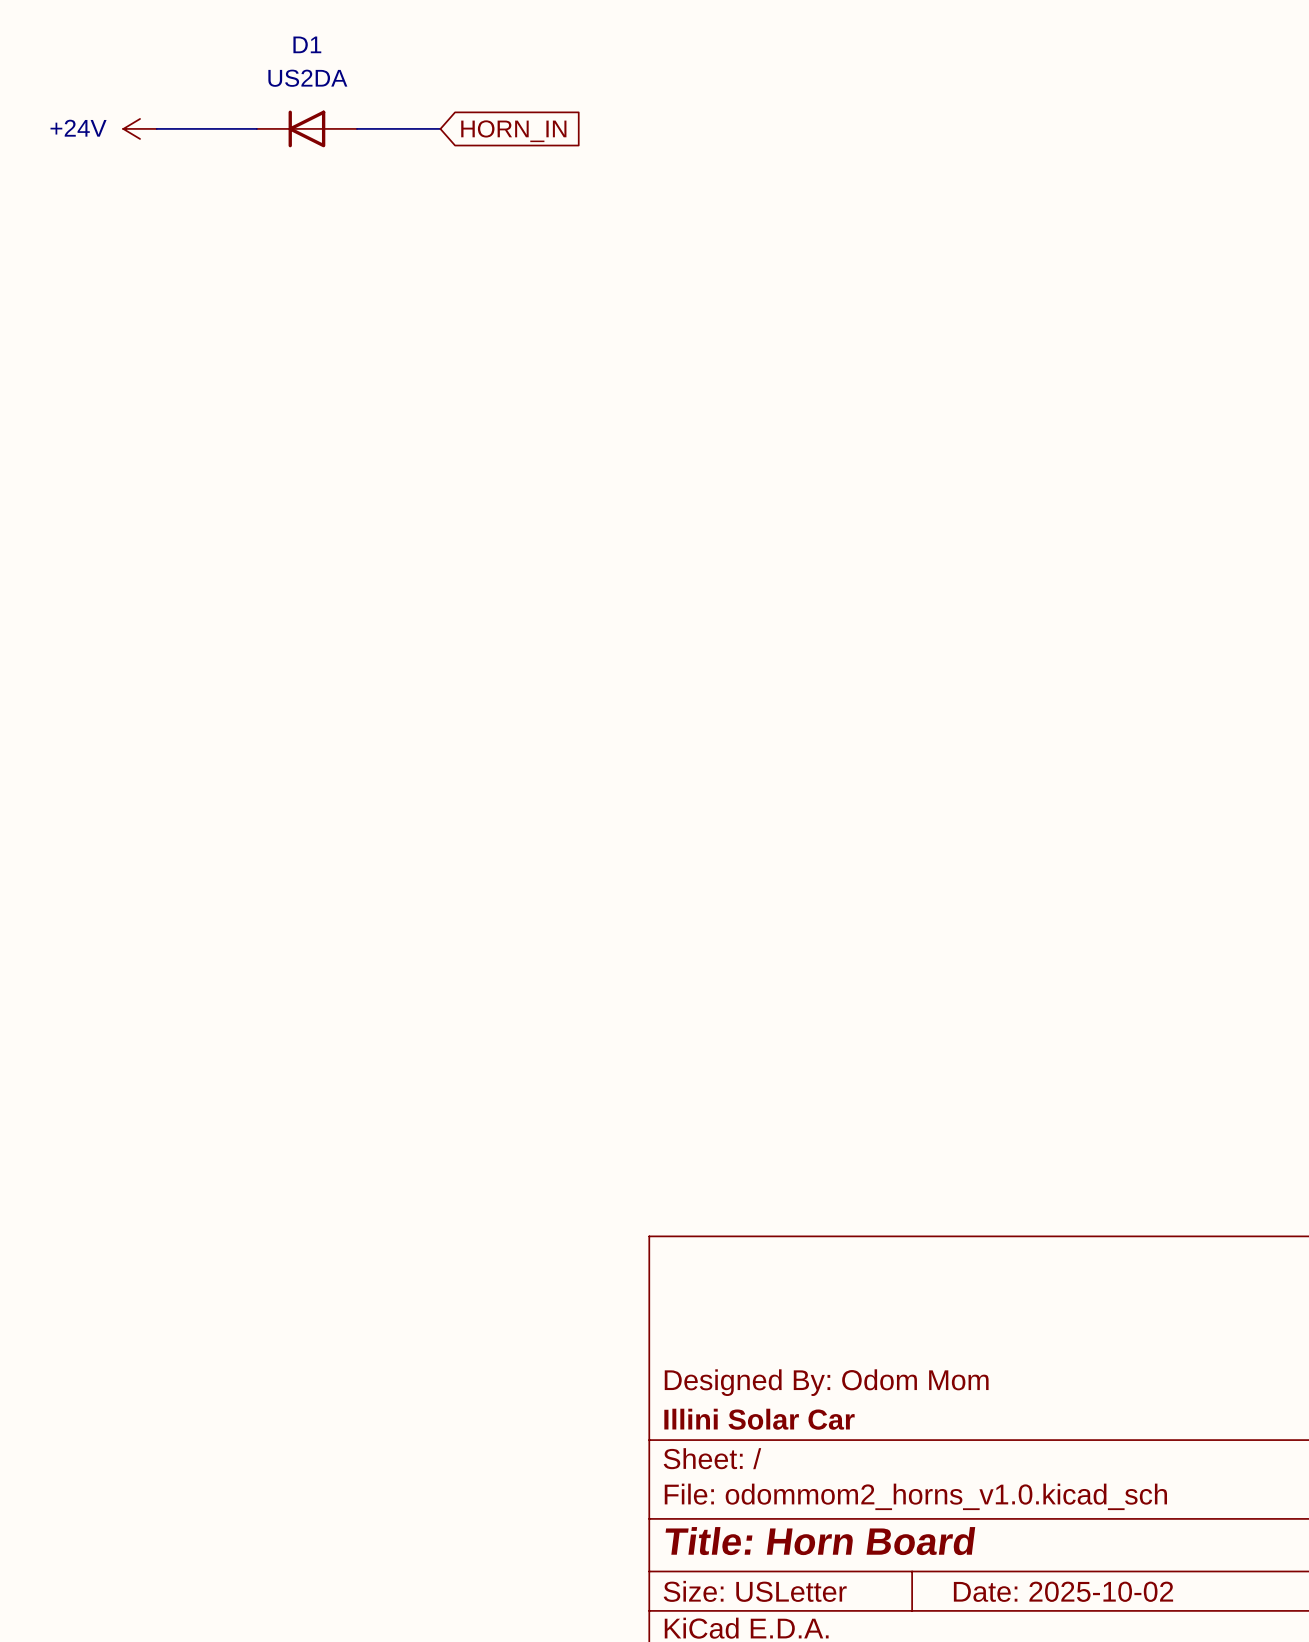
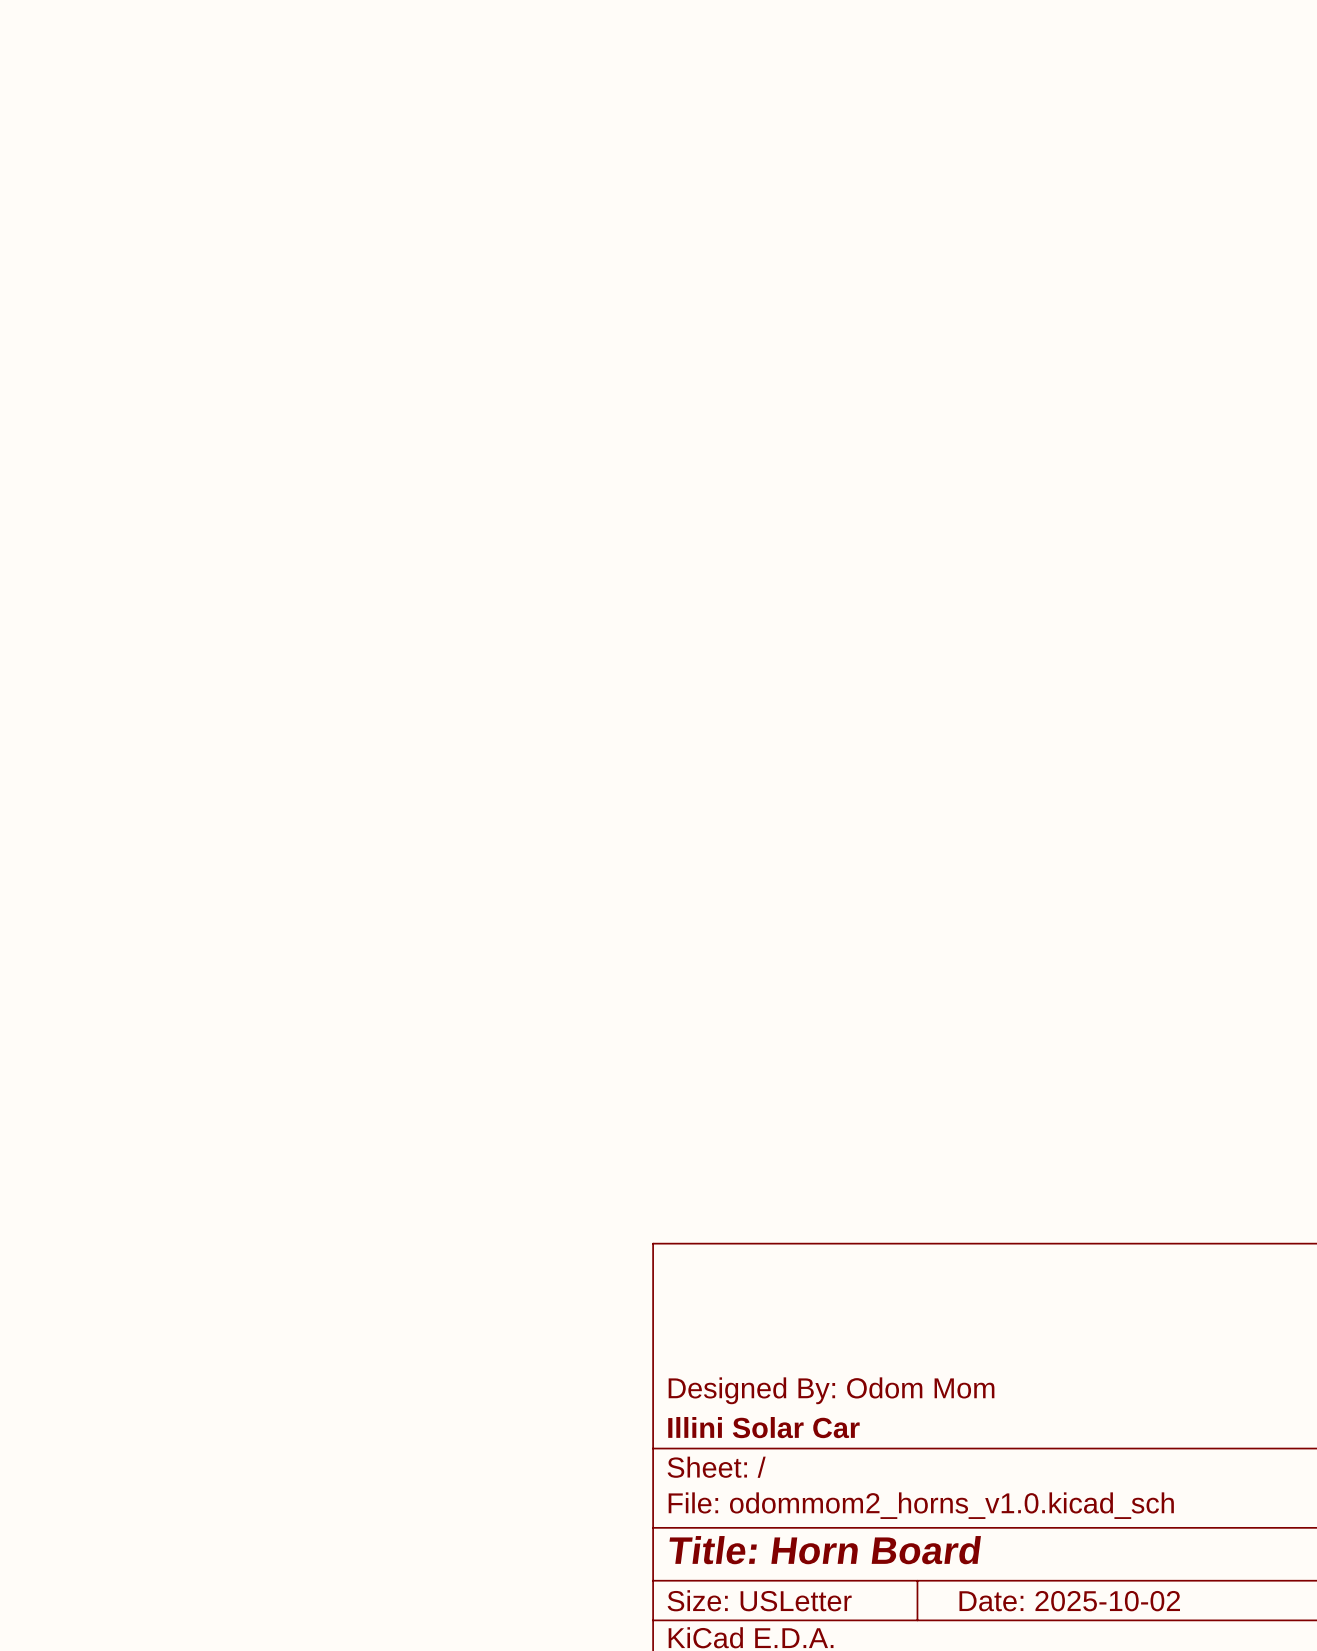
power symbol: +24V (140, 128) -> none
wire: (156, 128) (256, 128) -> none
D1: US2DA (306, 128) -> none
wire: (357, 128) (440, 128) -> none
global label: HORN_IN (513, 131) -> none

